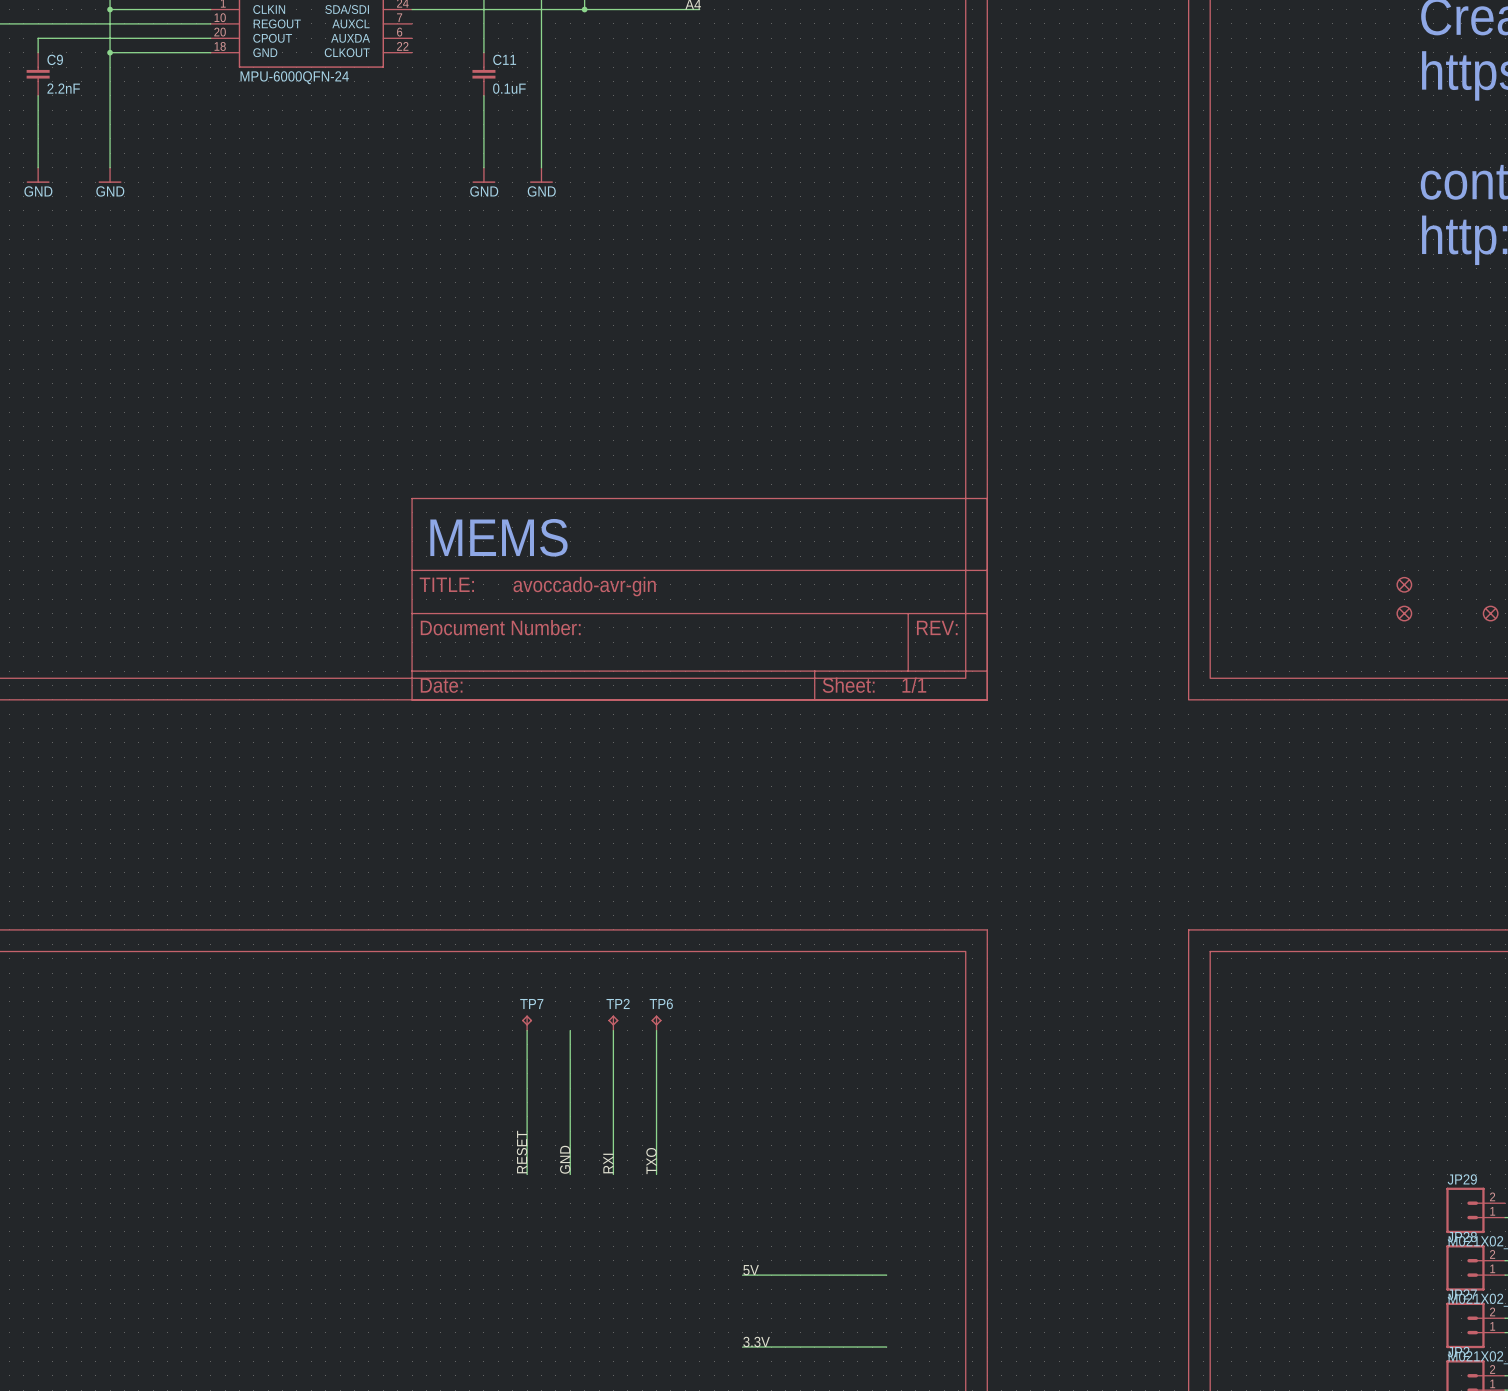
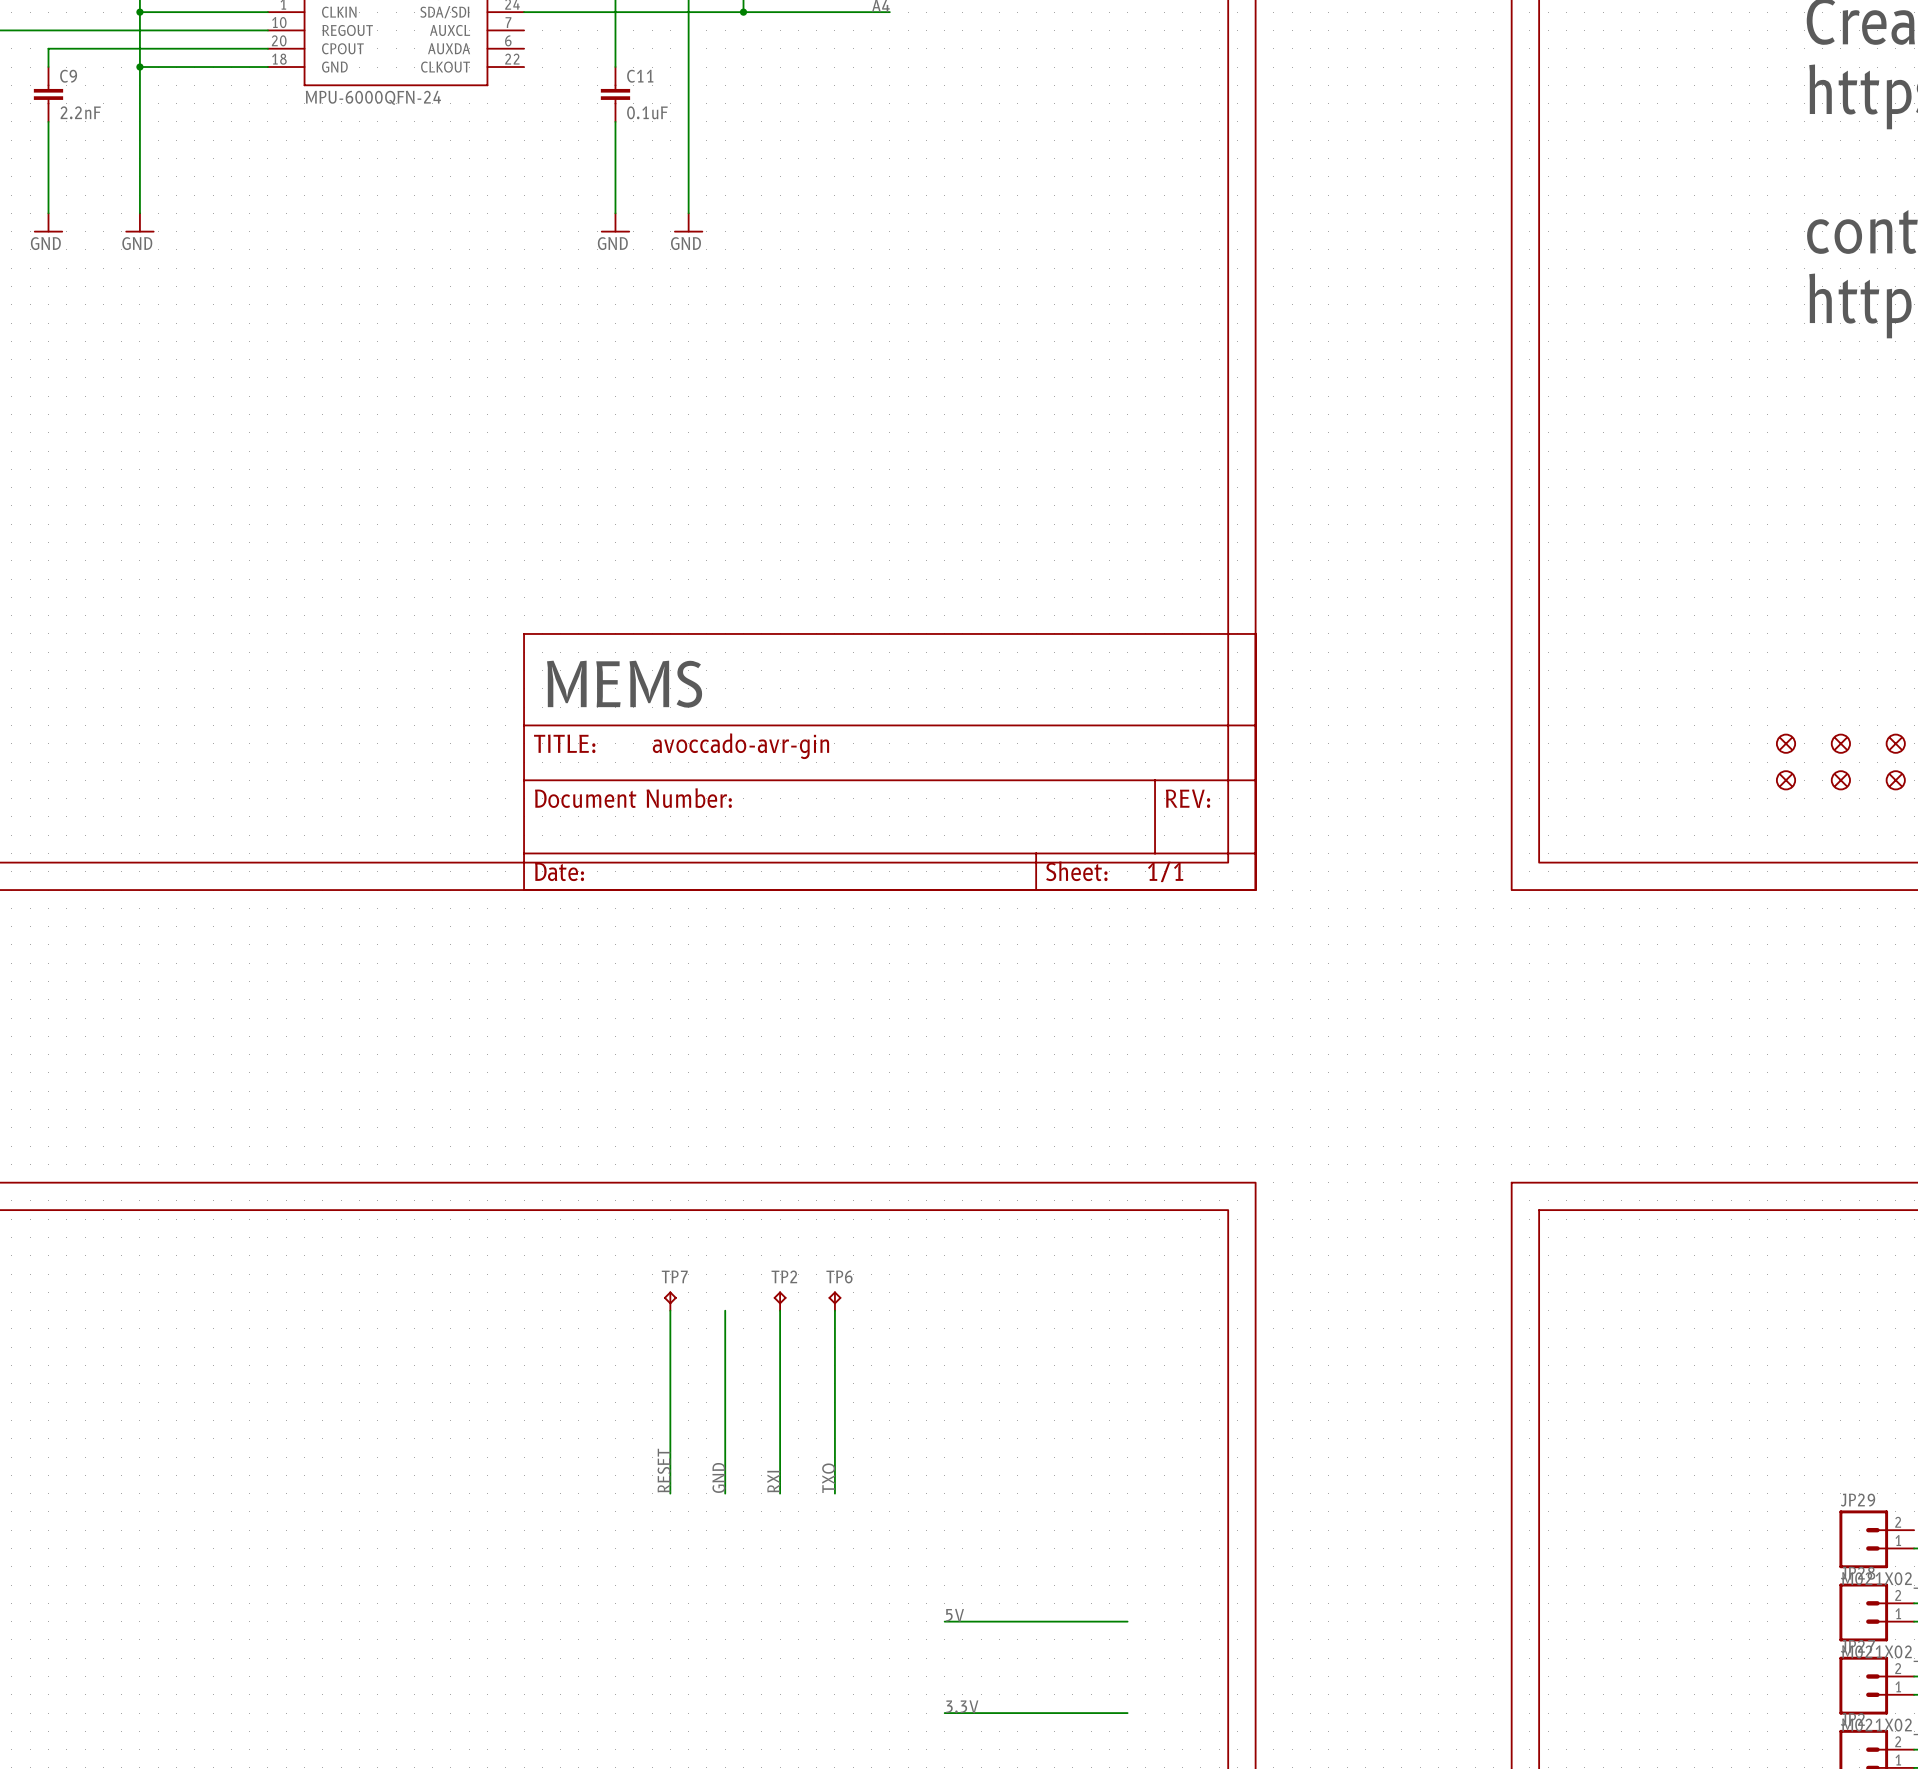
part: none -> (1840, 743)
part: none -> (1895, 743)
part: none -> (1840, 780)

